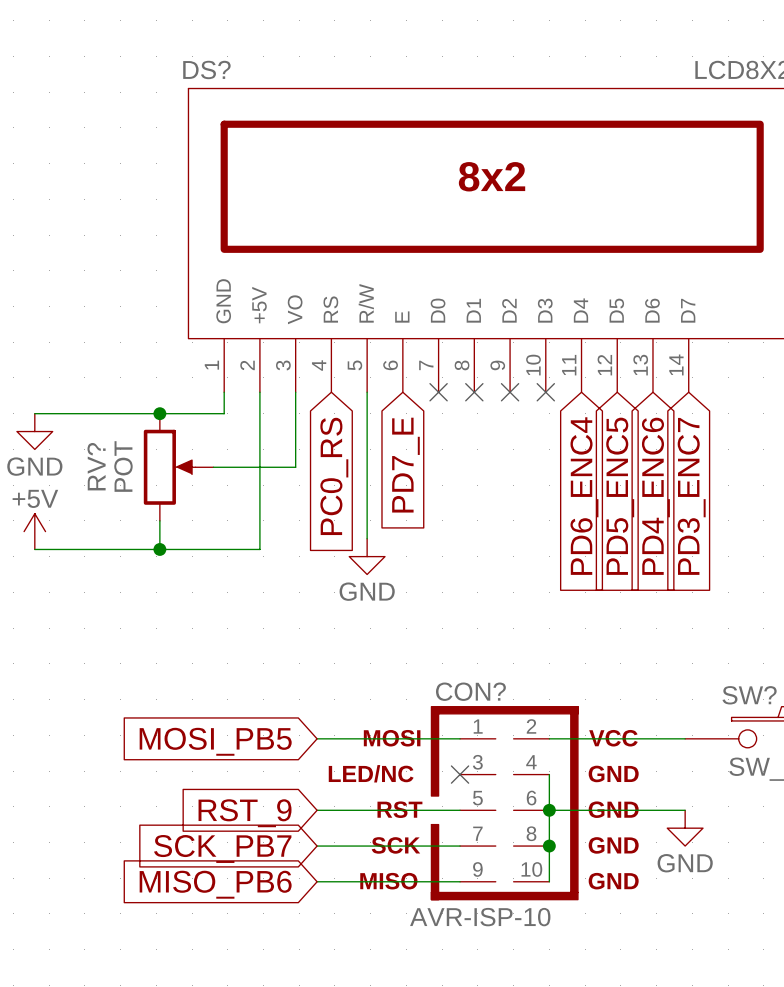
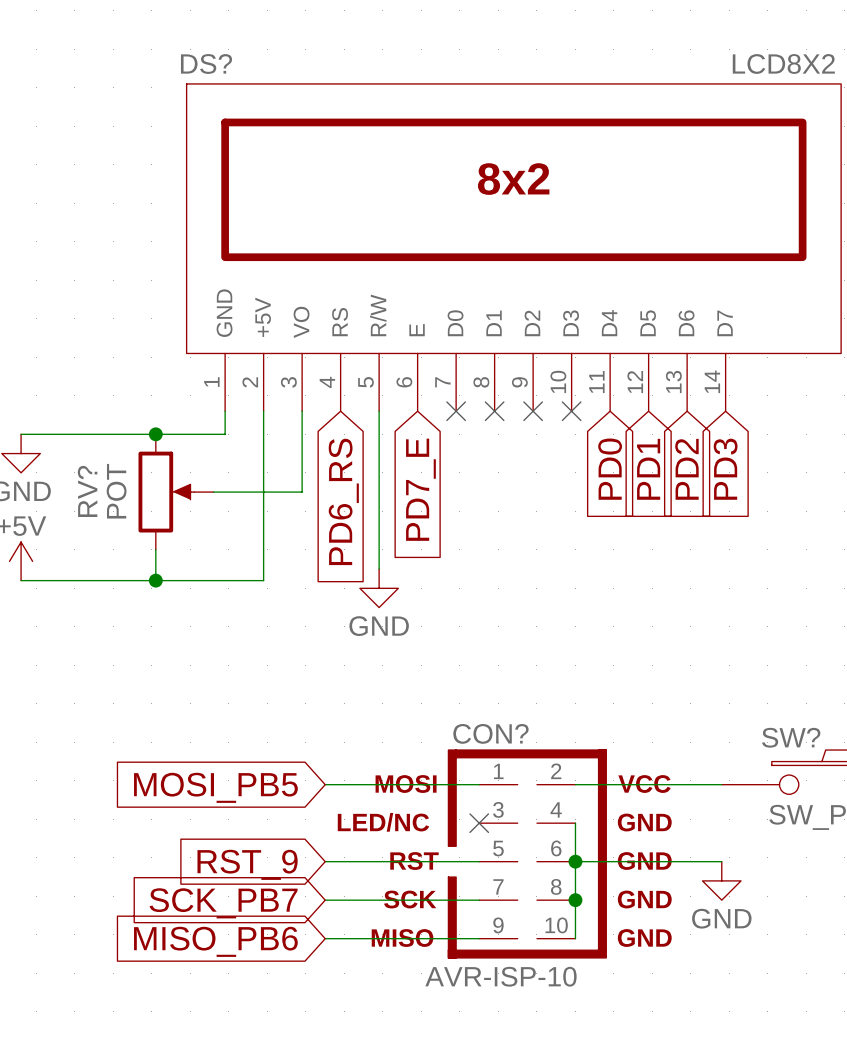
global label: PC0_RS (334, 476) -> PD6_RS (343, 501)
global label: PD6_ENC4 (584, 496) -> PD0 (610, 469)
global label: PD5_ENC5 (620, 496) -> PD1 (648, 469)
global label: PD4_ENC6 (655, 496) -> PD2 (686, 469)
global label: PD3_ENC7 (691, 496) -> PD3 (725, 469)

